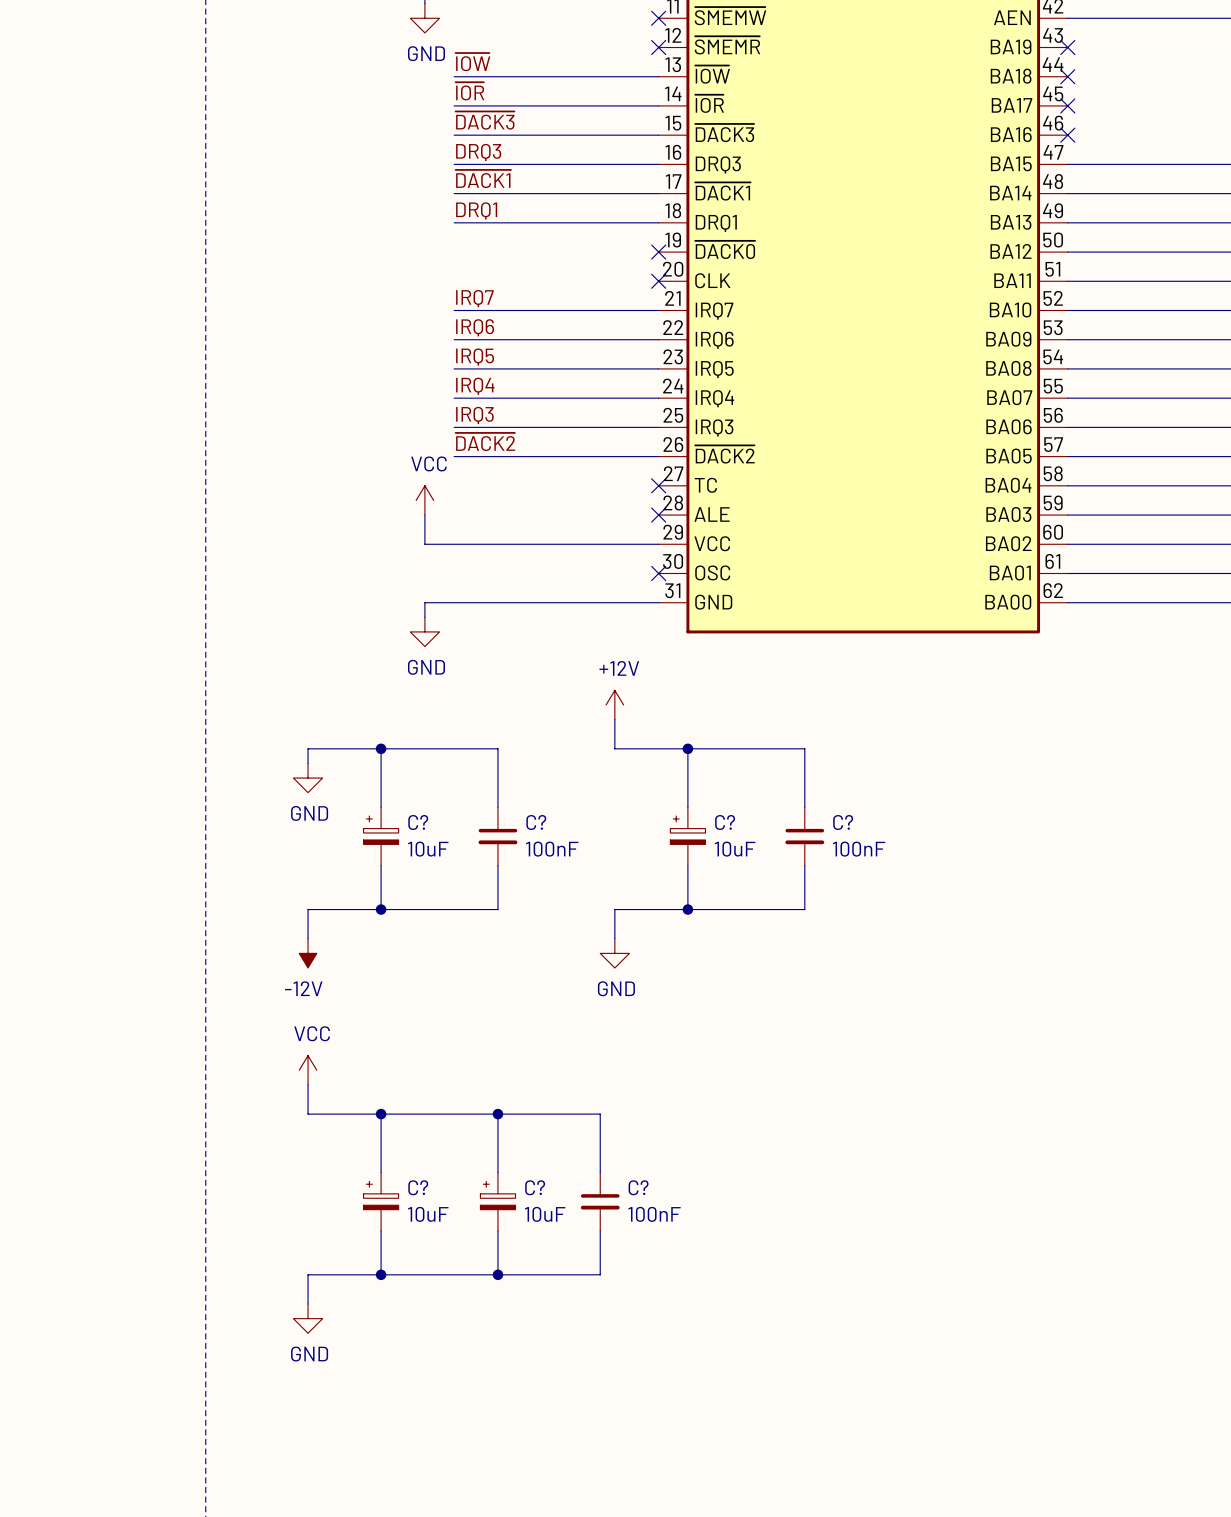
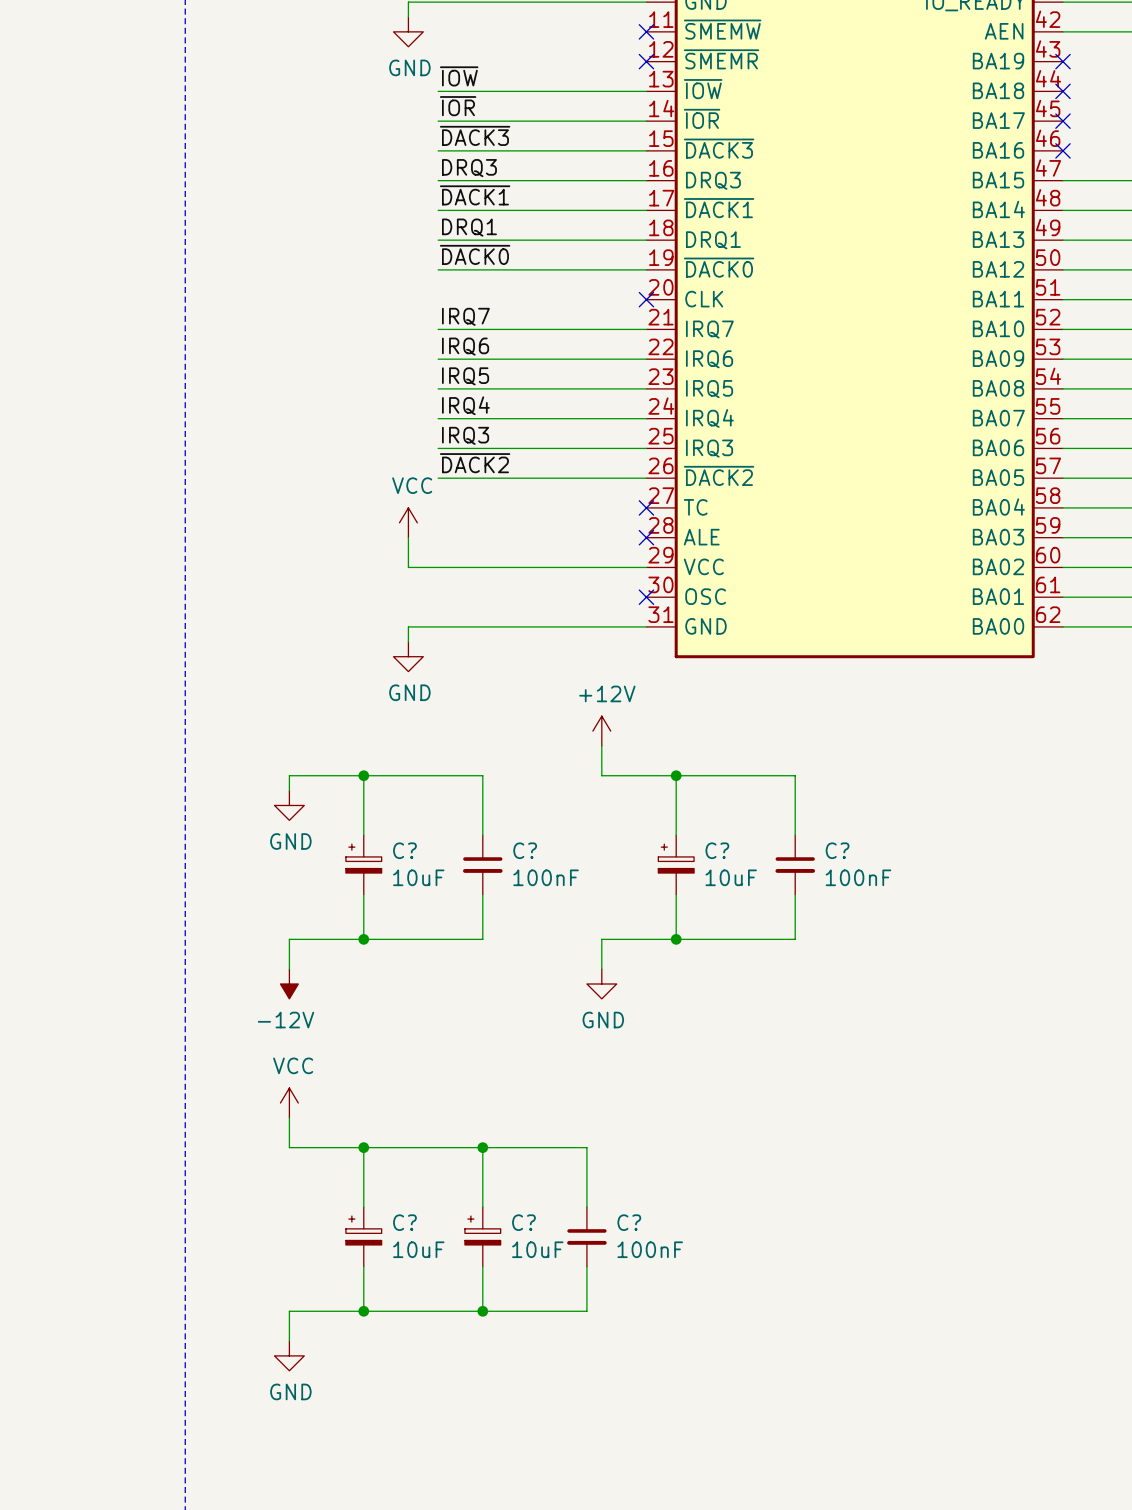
label: none -> ~{DACK0} (475, 254)
wire: none -> (438, 269) (646, 269)
no-connect mark: (658, 252) -> none

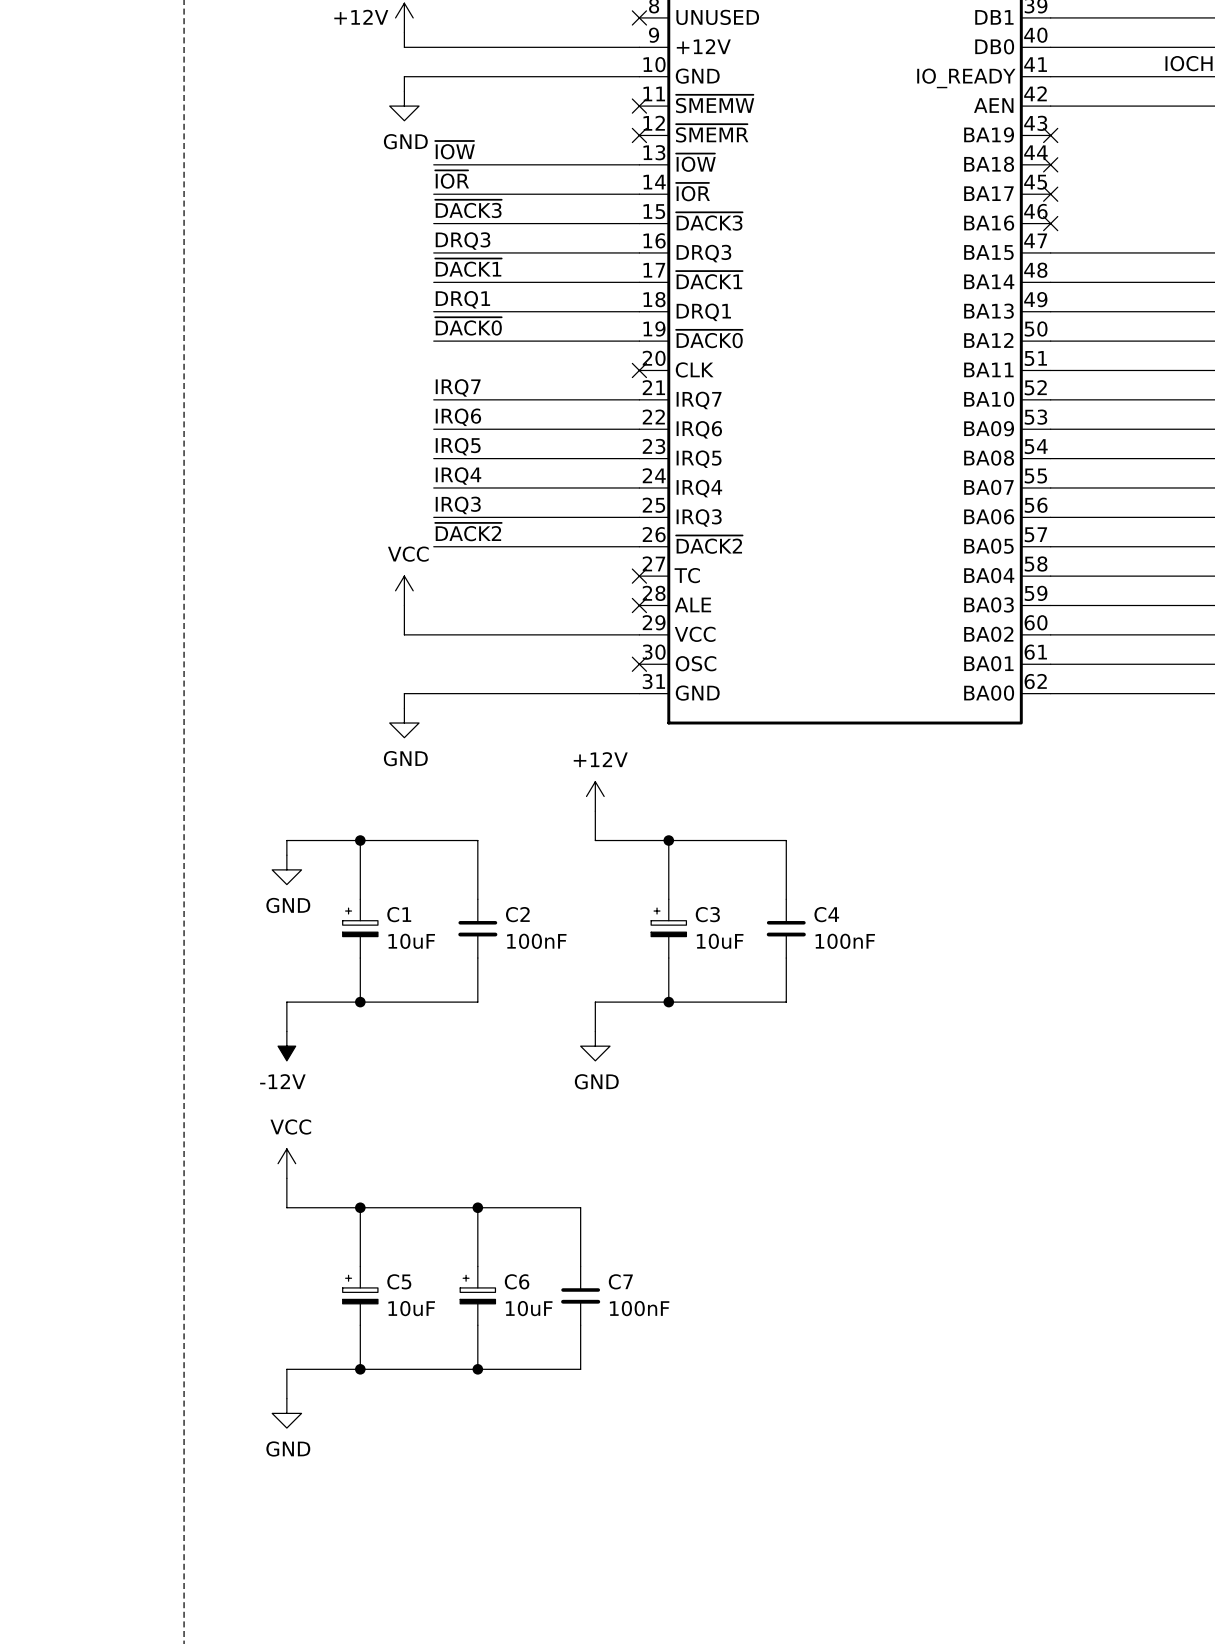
C? name: C? (404, 850) -> C1 (399, 914)
C? name: C? (525, 850) -> C2 (517, 914)
C? name: C? (717, 850) -> C3 (707, 914)
C? name: C? (837, 850) -> C4 (826, 914)
C? name: C? (404, 1222) -> C5 (399, 1281)
C? name: C? (523, 1222) -> C6 (517, 1281)
C? name: C? (629, 1222) -> C7 (620, 1281)

